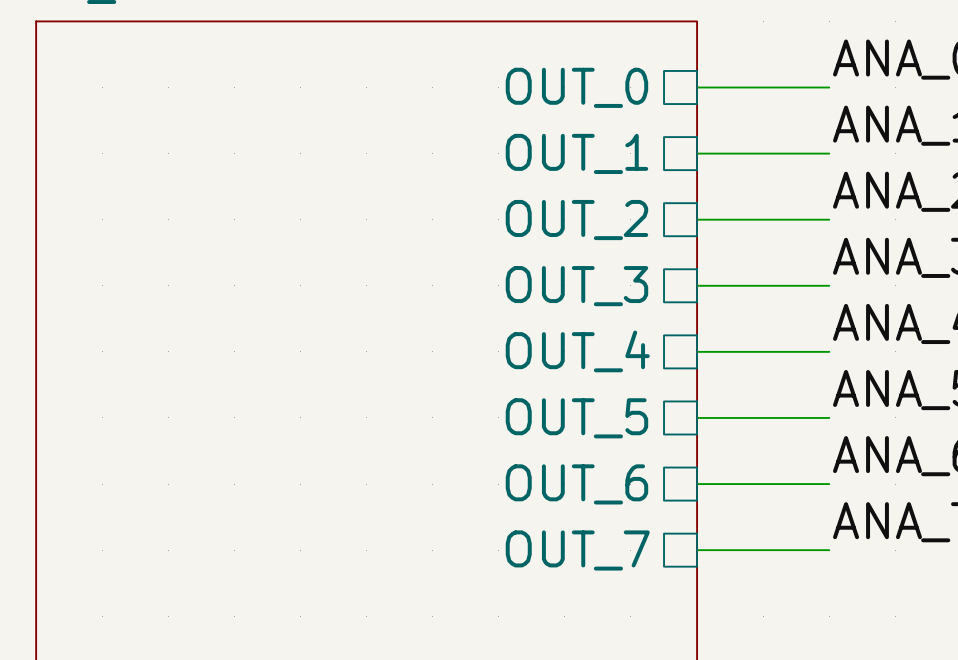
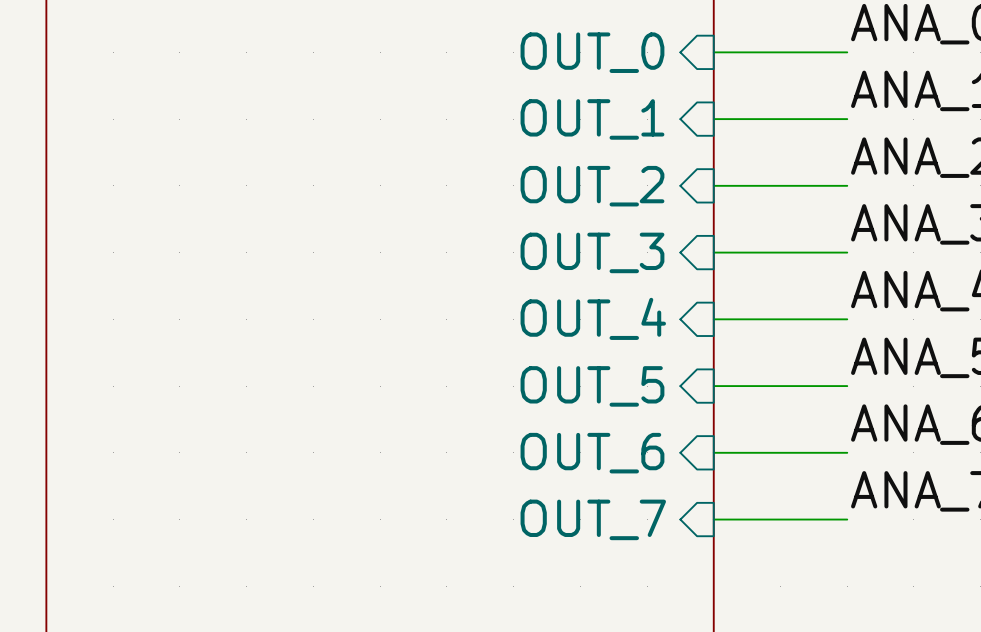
sheet pin shape: passive (576, 87) -> input (592, 52)
sheet pin shape: passive (576, 153) -> input (592, 119)
sheet pin shape: passive (576, 220) -> input (592, 186)
sheet pin shape: passive (576, 286) -> input (592, 252)
sheet pin shape: passive (577, 351) -> input (593, 318)
sheet pin shape: passive (576, 418) -> input (592, 386)
sheet pin shape: passive (576, 484) -> input (592, 453)
sheet pin shape: passive (577, 550) -> input (593, 519)

